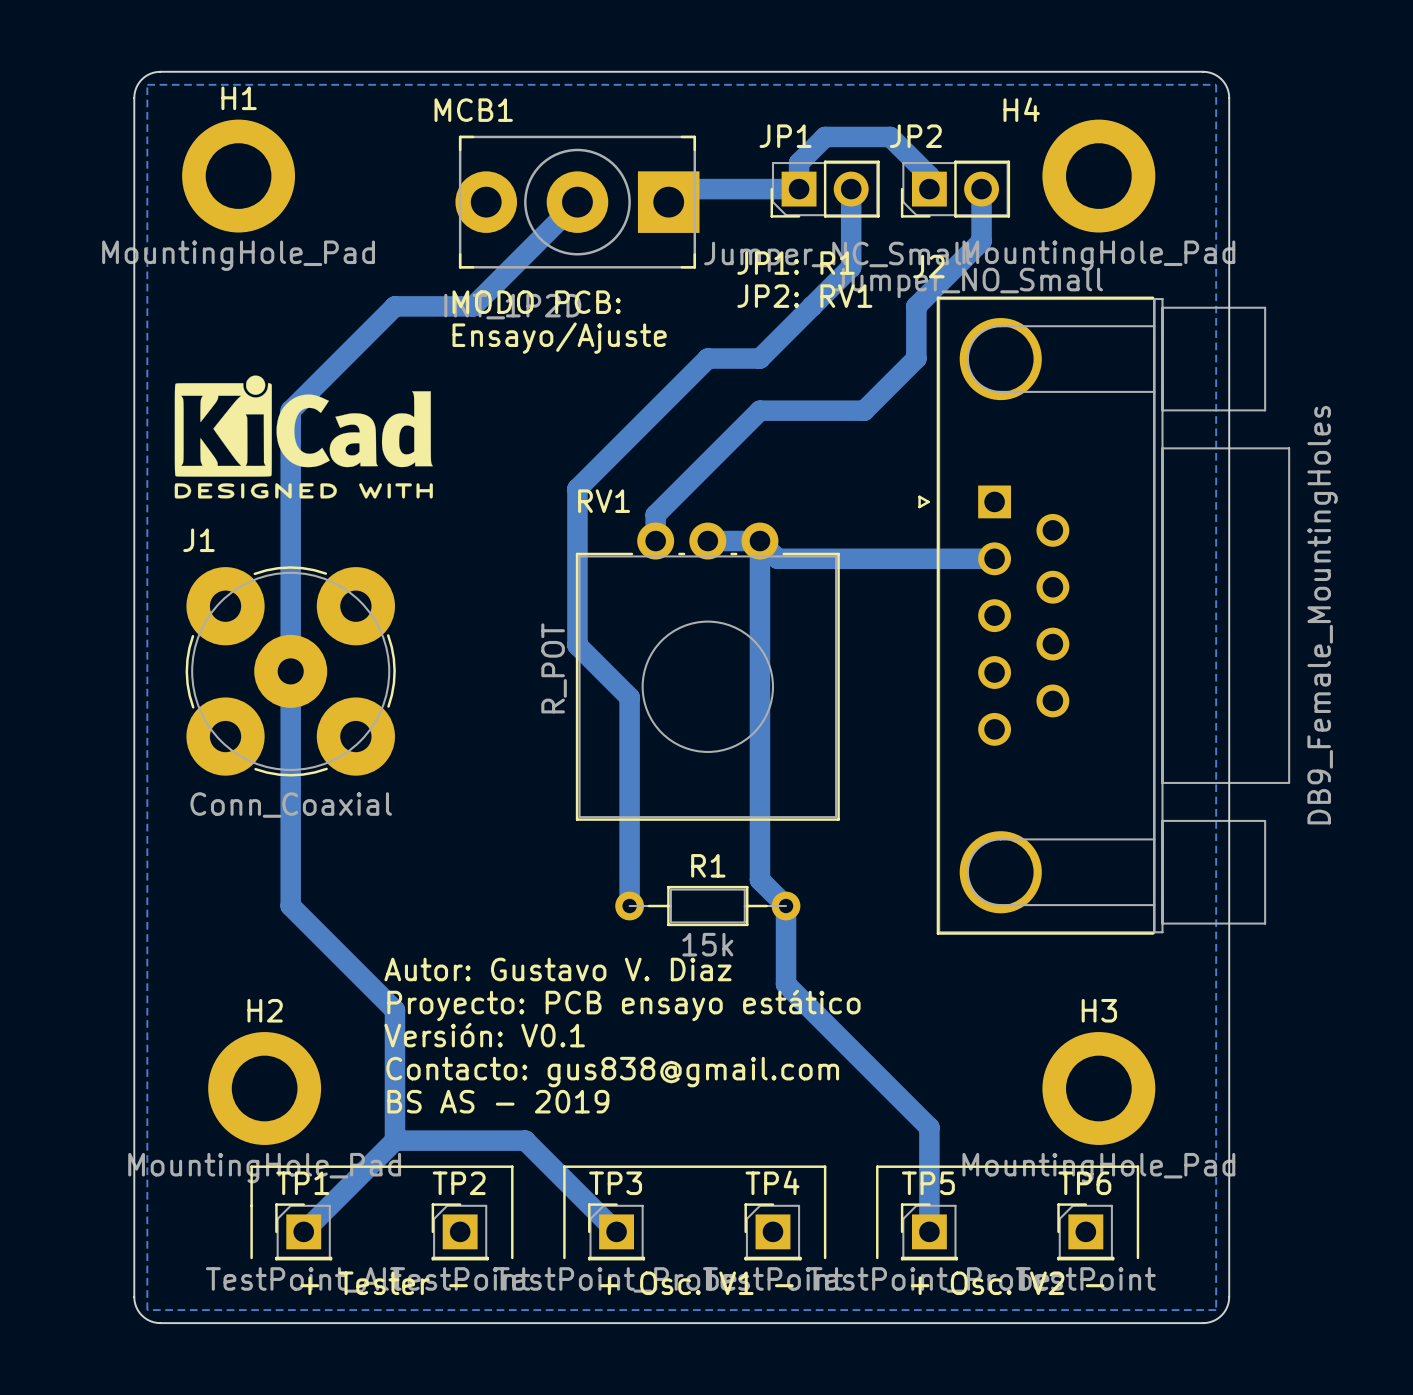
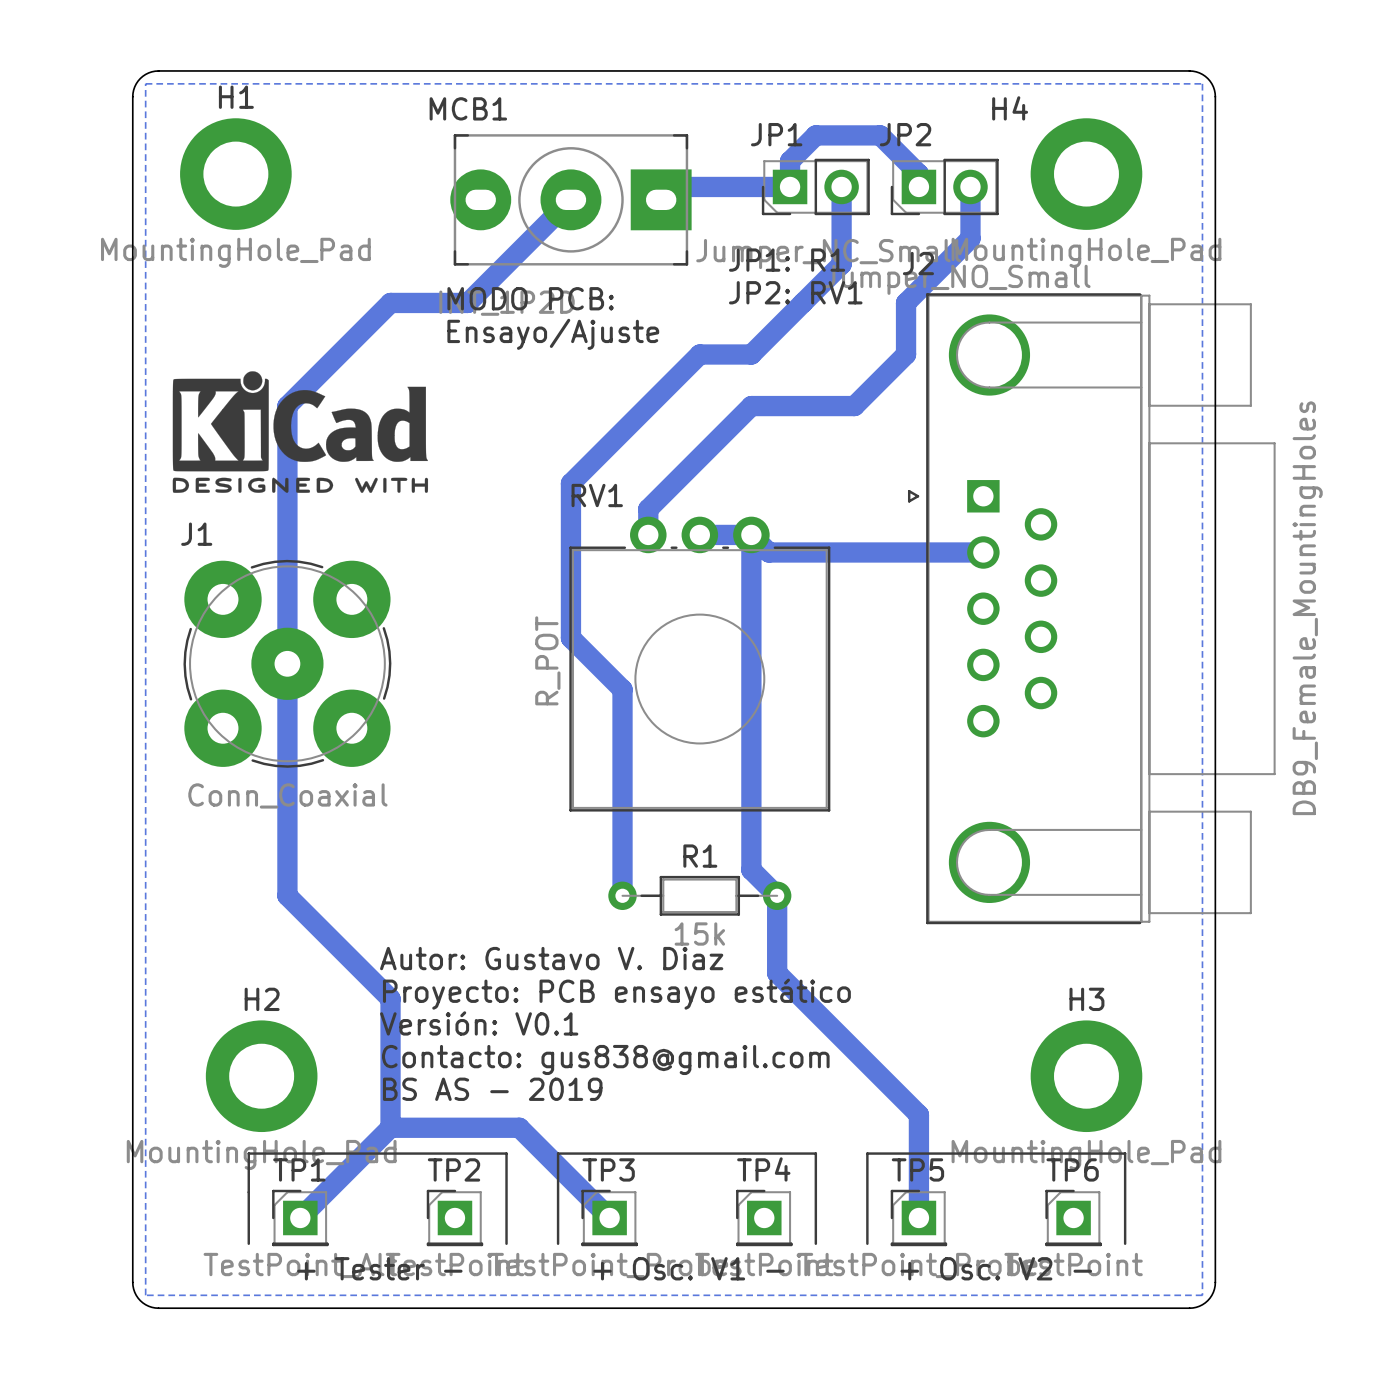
MCB1 footprint: [455, 135, 700, 269] -> [450, 134, 692, 266]

